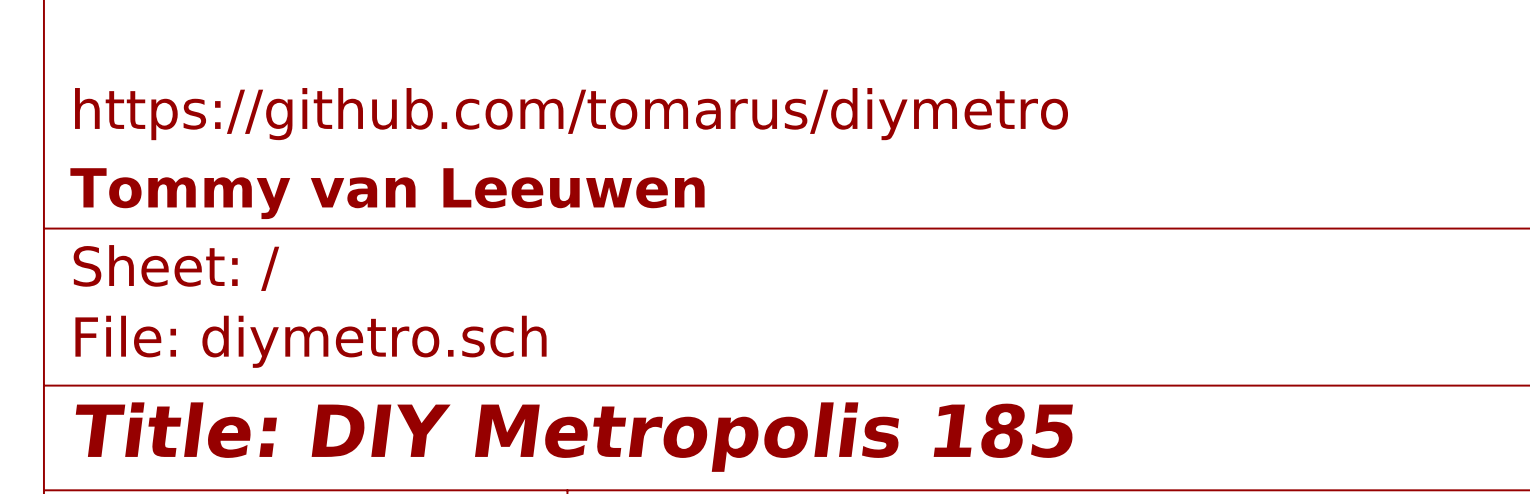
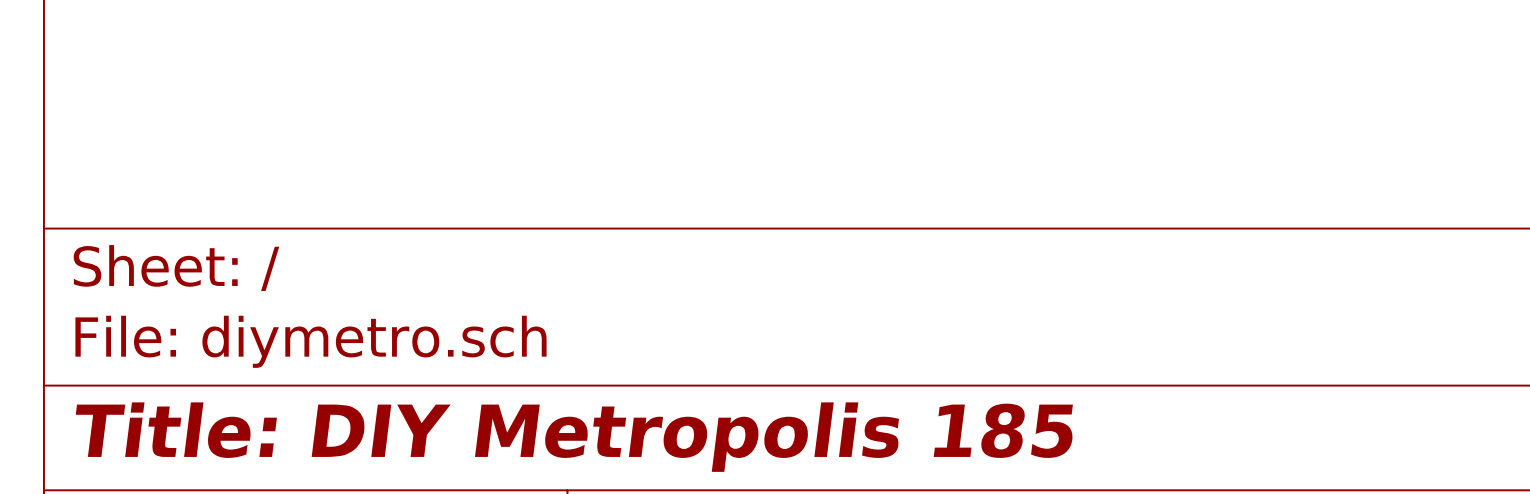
title block: https://github.com/tomarus/diymetro (571, 114) -> none
title block: Tommy van Leeuwen (387, 193) -> none

